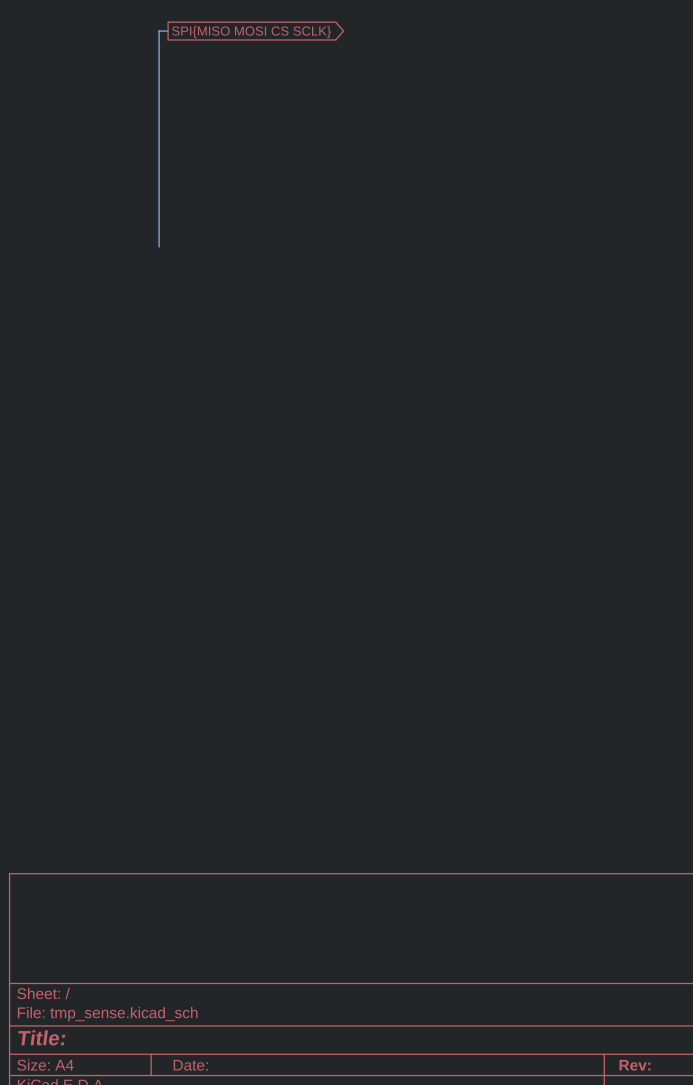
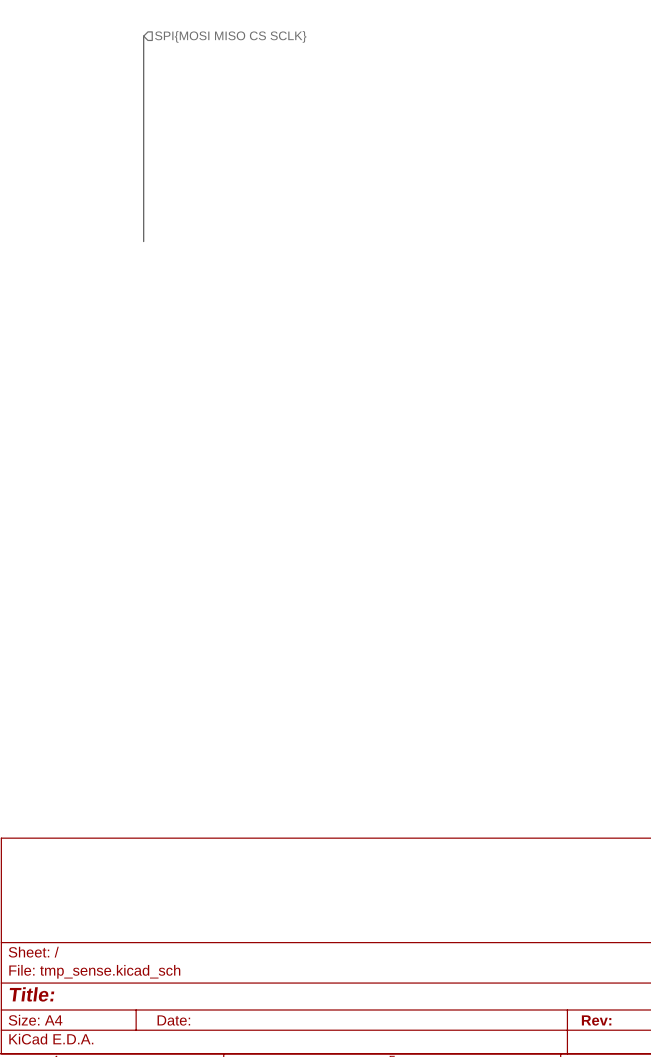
bus: (159, 31) (168, 31) -> none
hierarchical label: none -> SPI{MOSI MISO CS SCLK} (230, 36)
global label: SPI{MISO MOSI CS SCLK} (251, 32) -> none

